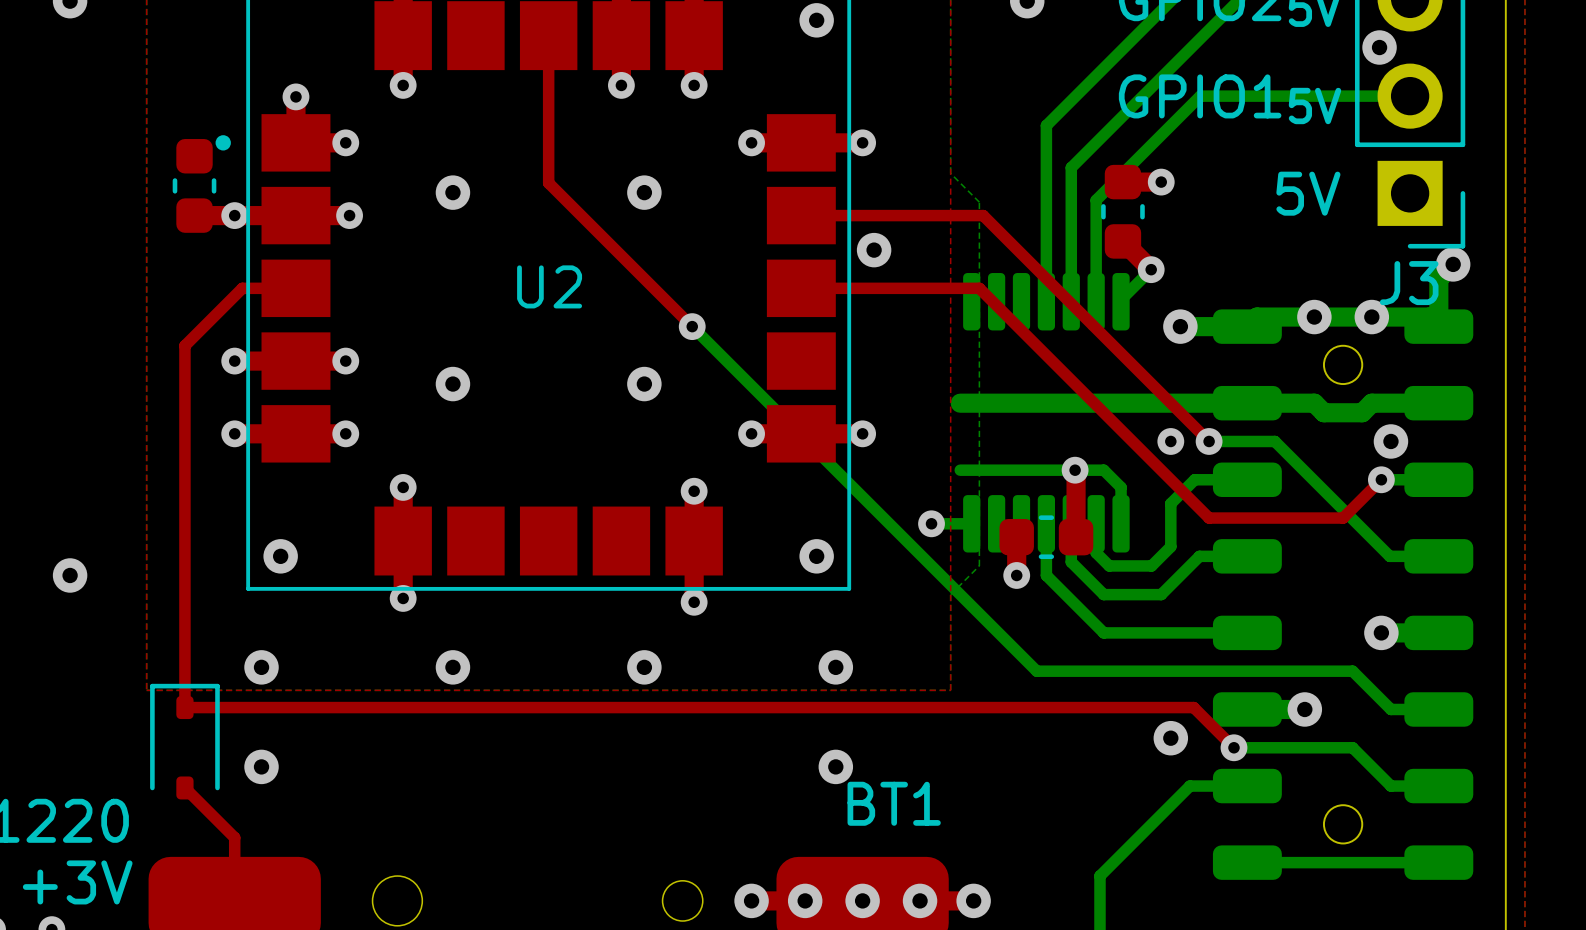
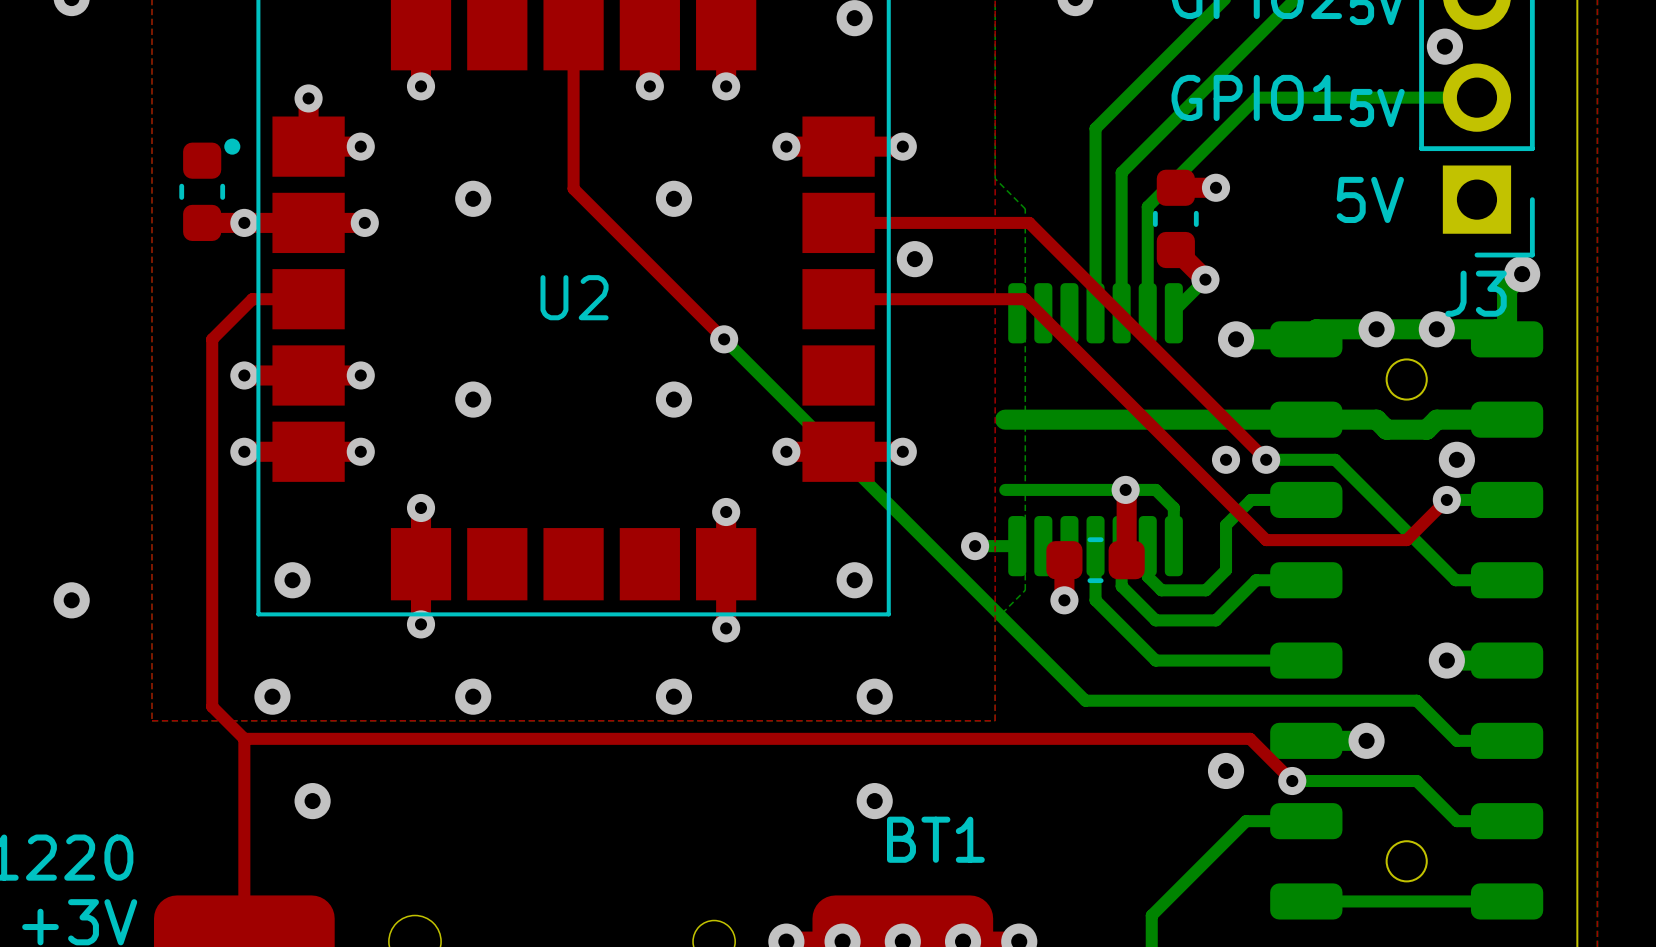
top track: (204, 326) (184, 345) (184, 707) (234, 707) -> (212, 339) (212, 706) (244, 738) (244, 875)
part: (184, 741) -> none
via position: (261, 766) -> (312, 801)
top track: (184, 787) (234, 837) -> none

